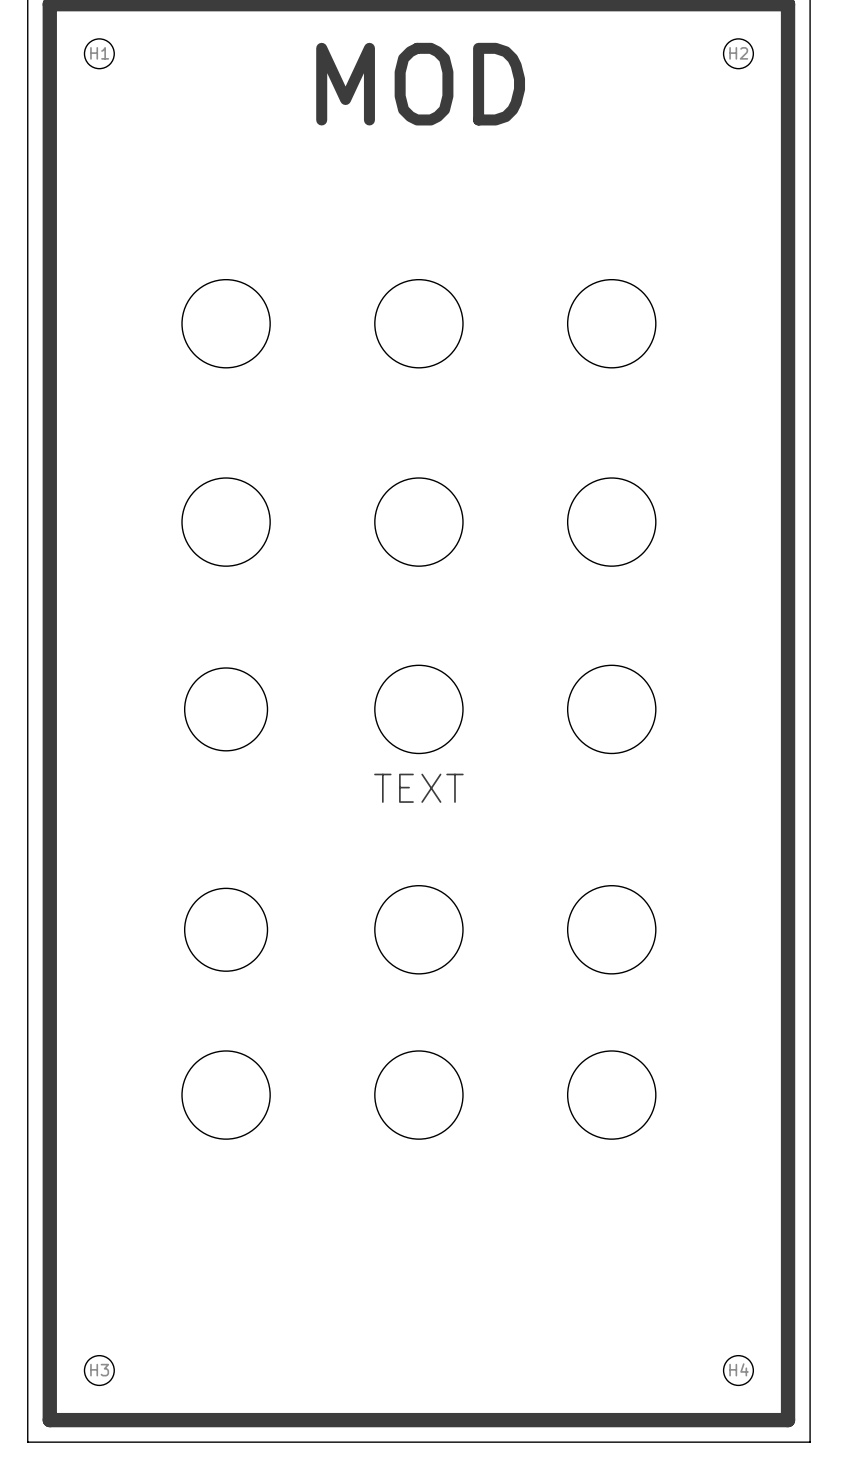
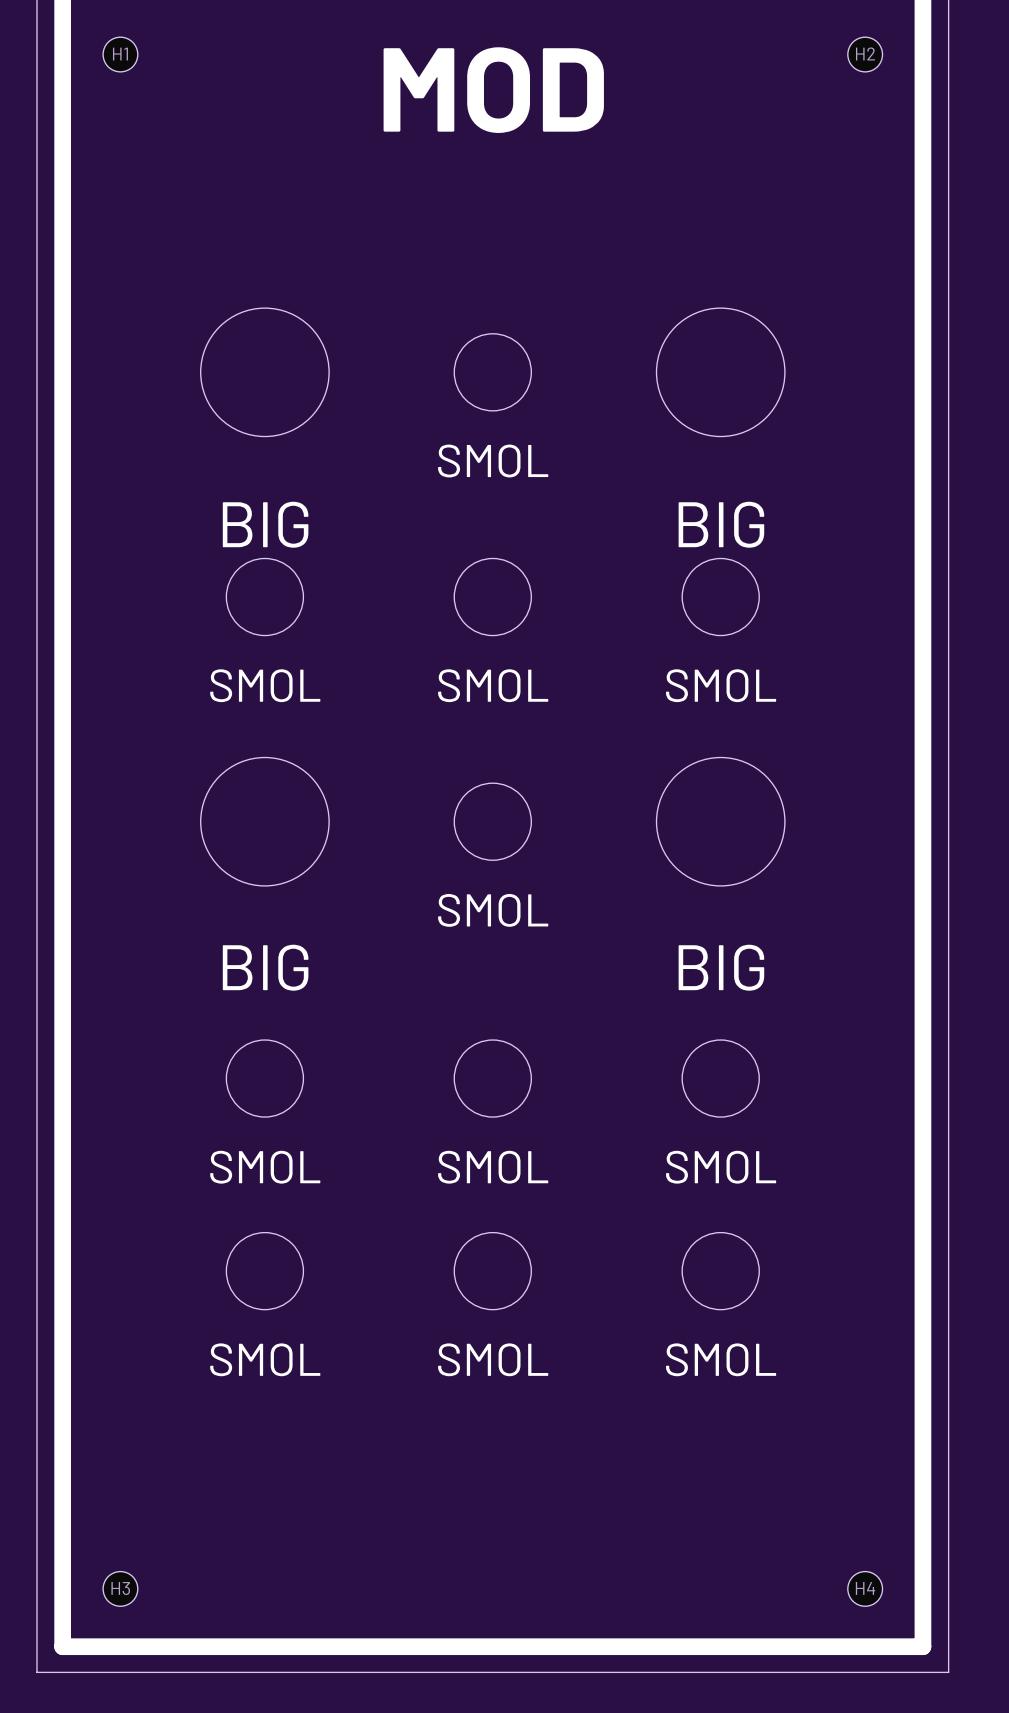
round board edge size: [181, 279, 271, 369] -> [200, 307, 330, 437]
round board edge size: [374, 279, 464, 369] -> [453, 333, 532, 412]
round board edge size: [567, 279, 657, 369] -> [656, 307, 786, 437]
text: none -> SMOL (493, 461)
text: none -> BIG (265, 524)
text: none -> BIG (721, 524)
round board edge size: [181, 477, 271, 567] -> [226, 558, 304, 636]
round board edge size: [374, 477, 464, 567] -> [453, 558, 532, 636]
round board edge size: [567, 477, 657, 567] -> [681, 558, 760, 636]
text: none -> SMOL (265, 685)
text: none -> SMOL (493, 685)
text: none -> SMOL (721, 685)
round board edge size: [374, 665, 464, 754] -> [453, 782, 532, 861]
round board edge size: [567, 665, 657, 754] -> [656, 757, 786, 887]
round board edge size: [184, 667, 268, 752] -> [200, 757, 330, 887]
text: TEXT (418, 788) -> SMOL (493, 910)
text: none -> BIG (265, 967)
text: none -> BIG (721, 967)
round board edge size: [374, 885, 464, 975] -> [453, 1039, 532, 1118]
round board edge size: [567, 885, 657, 975] -> [681, 1039, 760, 1118]
round board edge size: [184, 888, 268, 972] -> [226, 1039, 304, 1118]
text: none -> SMOL (265, 1167)
text: none -> SMOL (493, 1167)
text: none -> SMOL (721, 1167)
round board edge size: [181, 1050, 271, 1140] -> [226, 1232, 304, 1310]
round board edge size: [374, 1050, 464, 1140] -> [453, 1232, 532, 1310]
round board edge size: [567, 1050, 657, 1140] -> [681, 1232, 760, 1310]
text: none -> SMOL (265, 1359)
text: none -> SMOL (493, 1359)
text: none -> SMOL (721, 1359)

